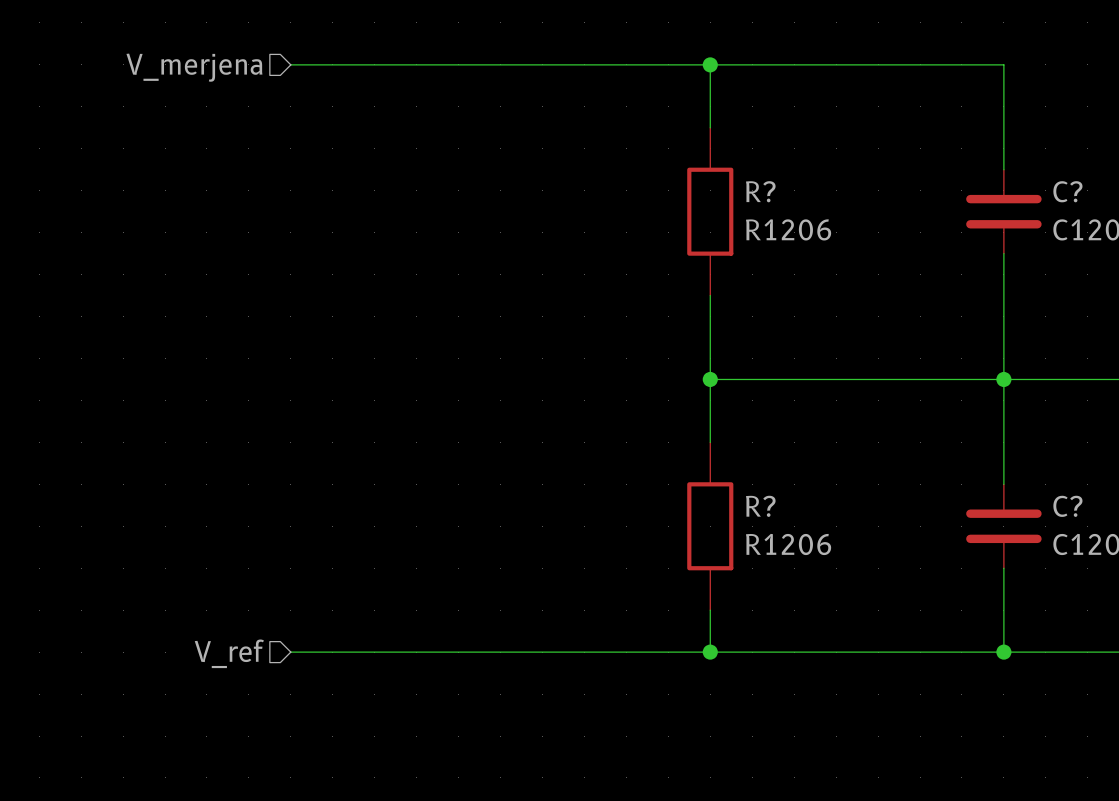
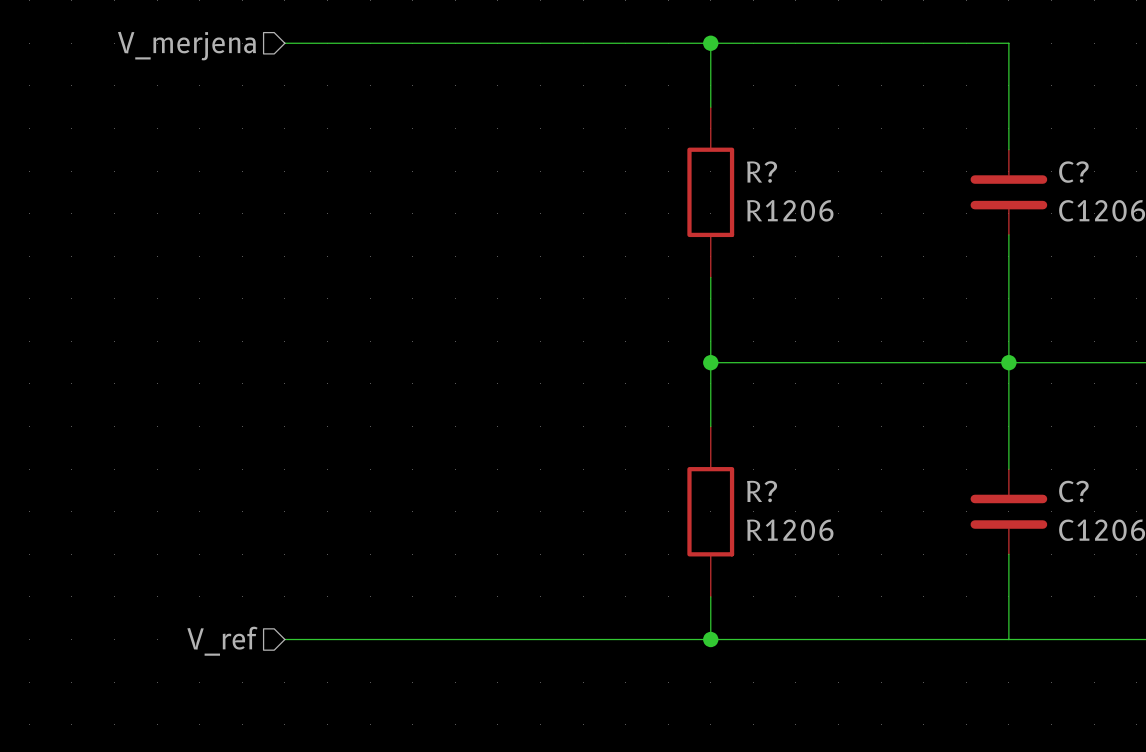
junction: (1003, 652) -> none

